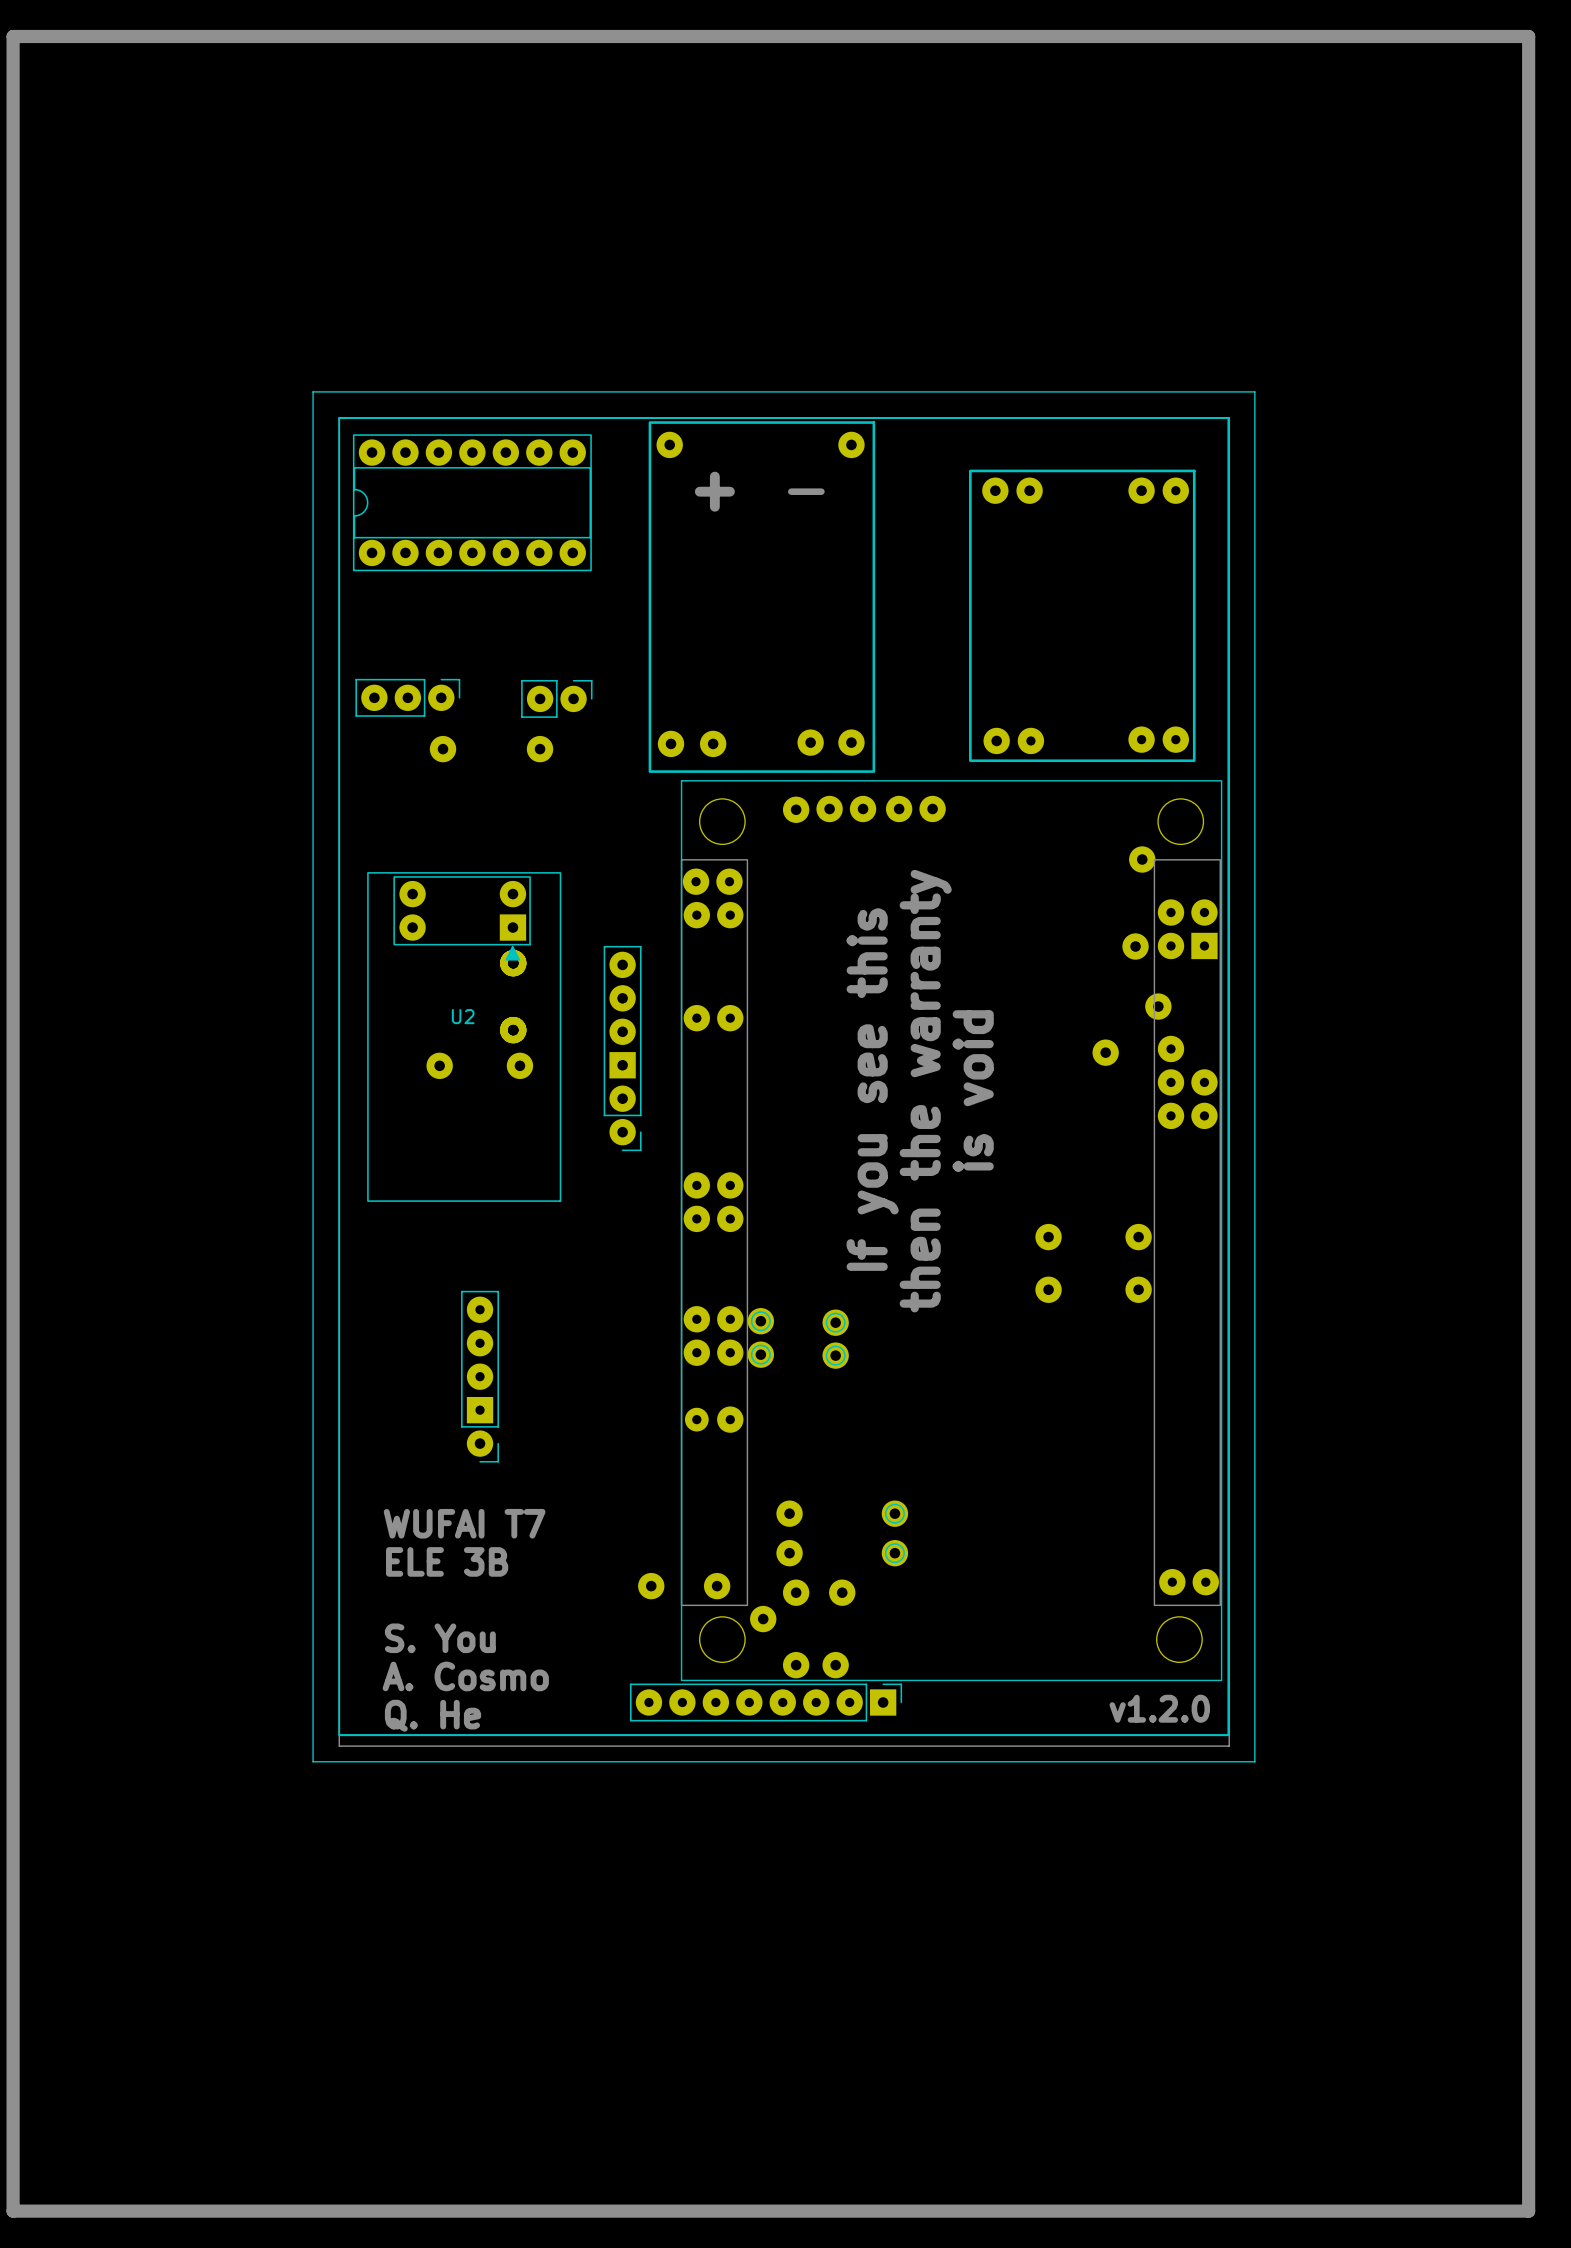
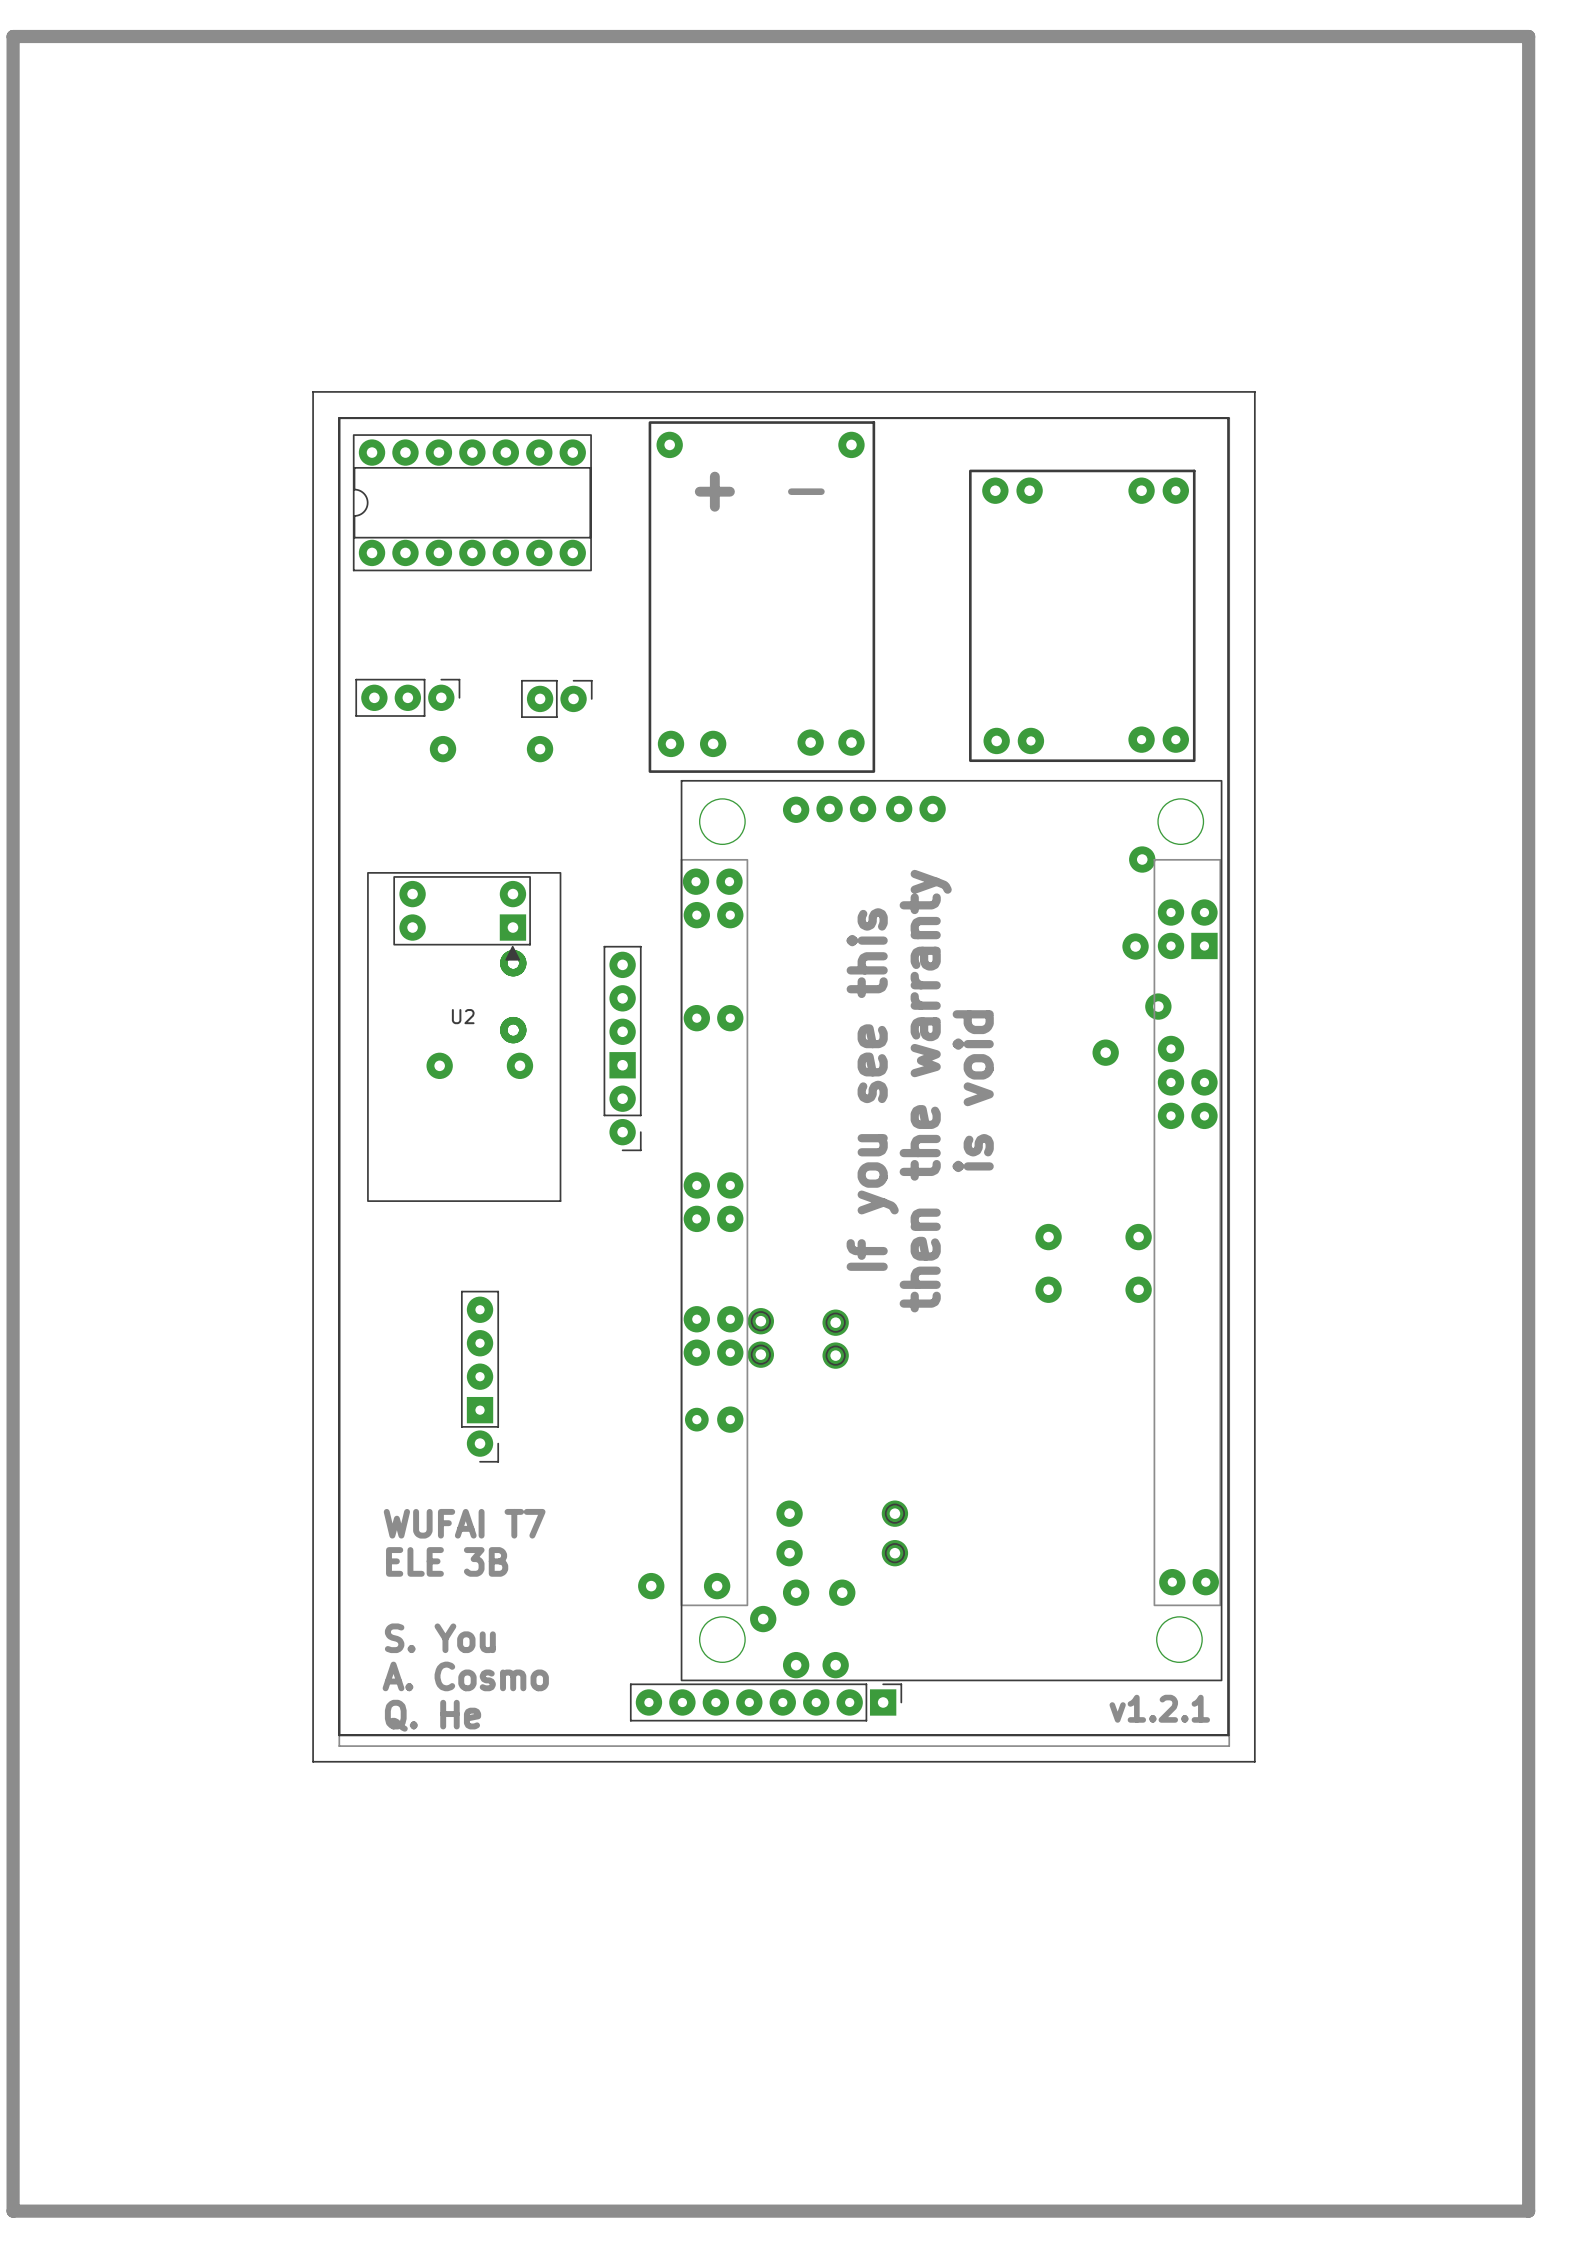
text: v1.2.0 (1159, 1708) -> v1.2.1 (1159, 1708)

